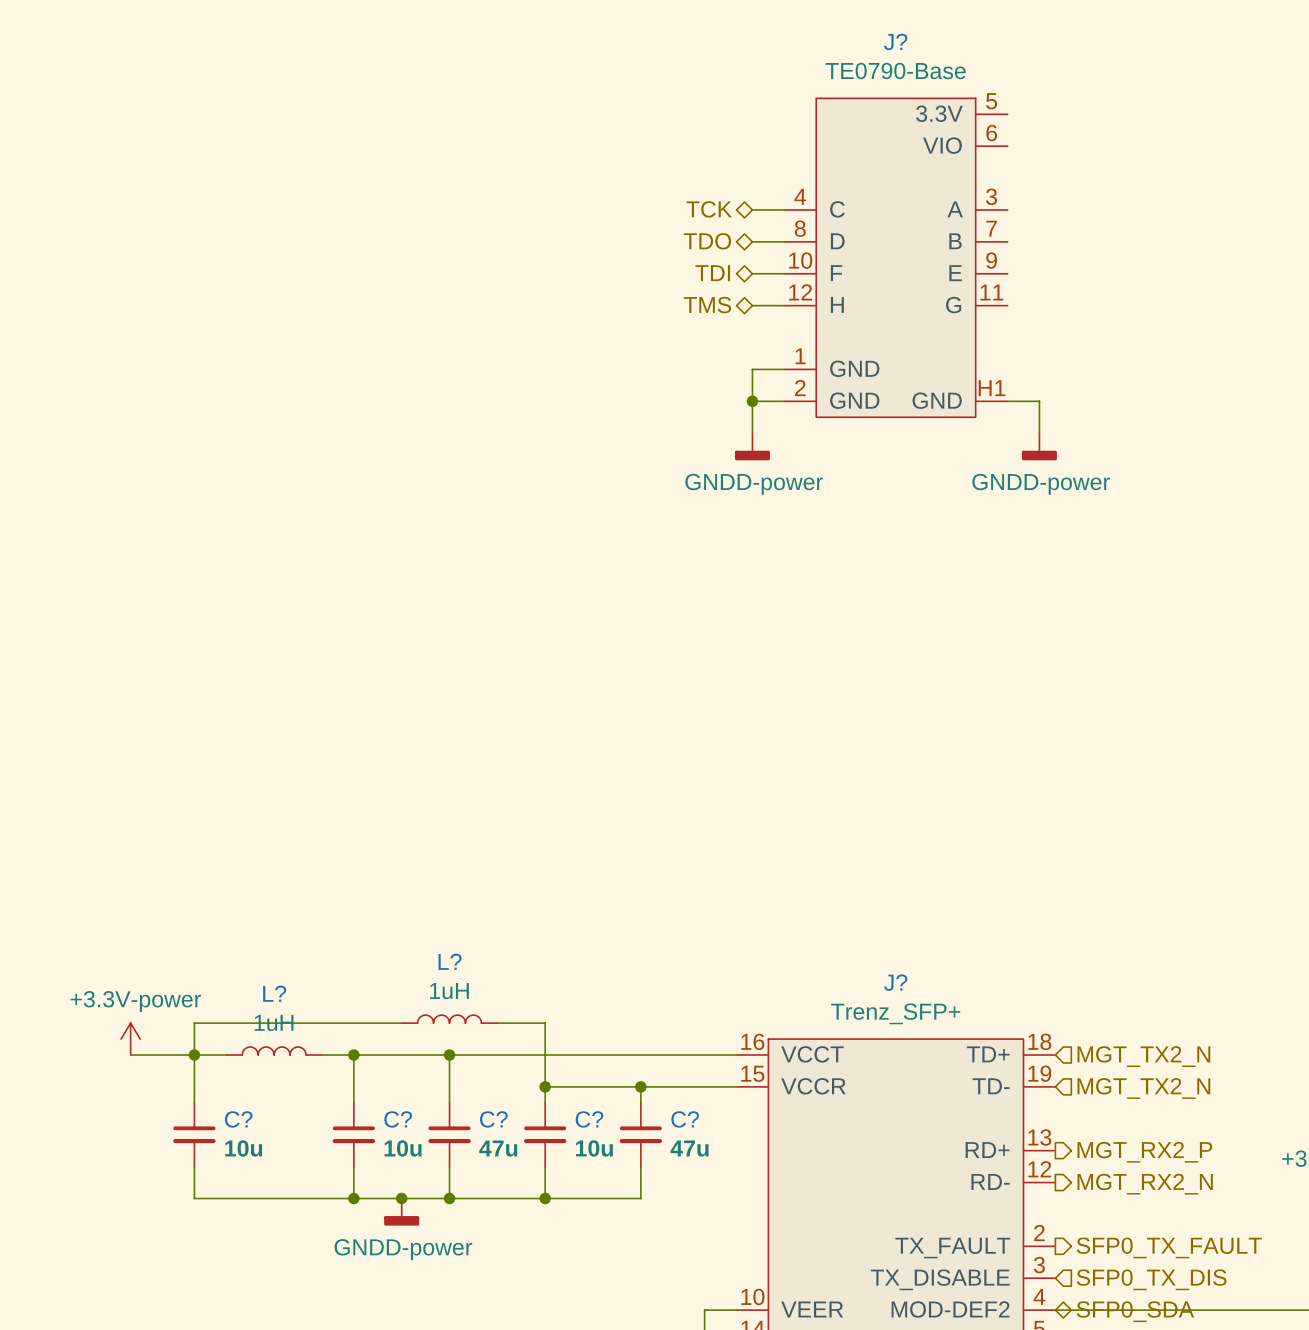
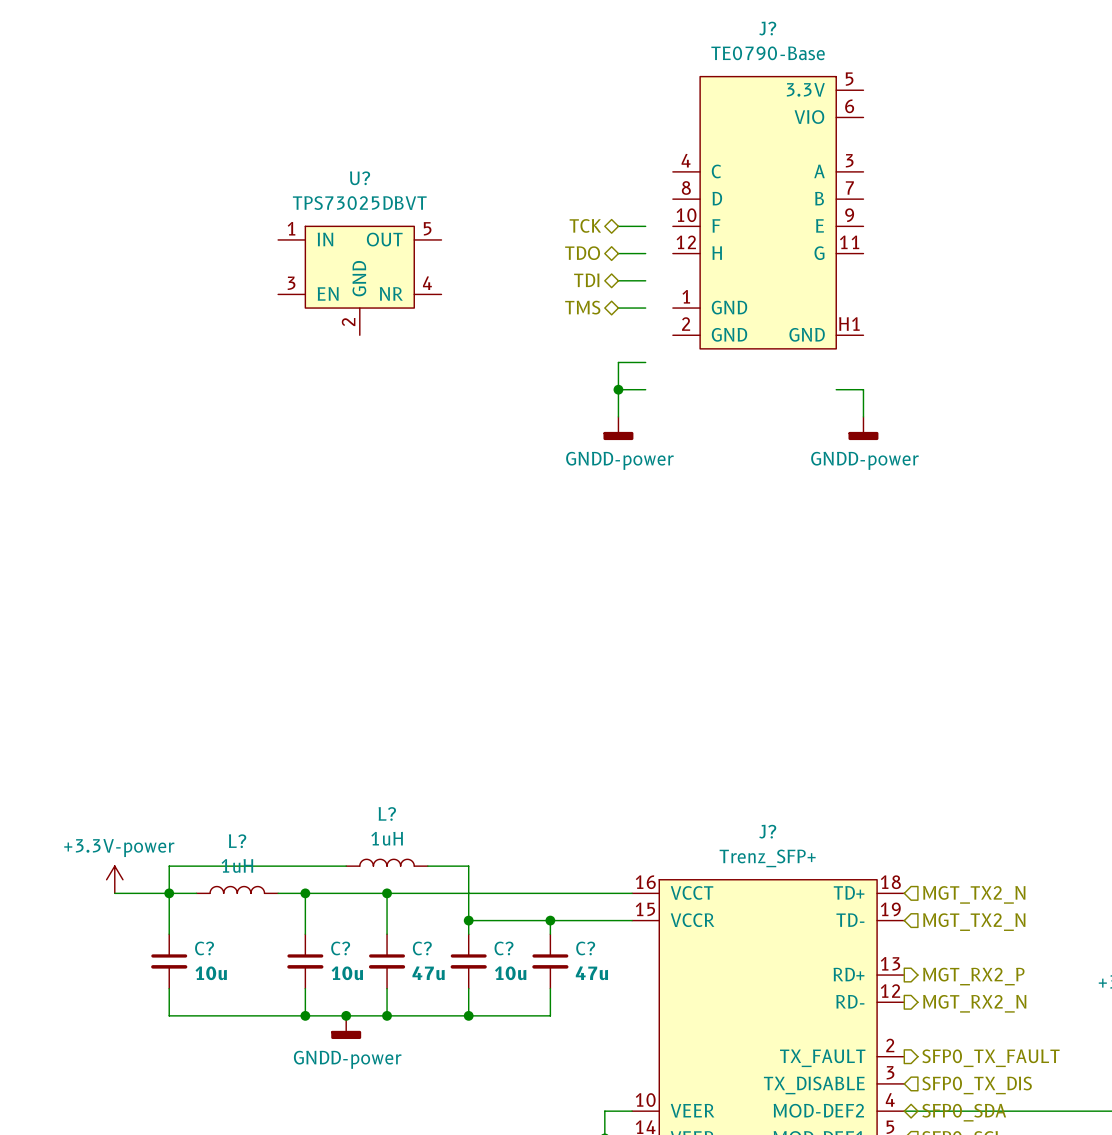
hierarchical label position: TCK (709, 209) -> TCK (585, 225)
wire: (752, 209) (784, 209) -> (618, 308) (645, 308)
hierarchical label position: TDO (707, 241) -> TDO (582, 253)
wire: (752, 241) (784, 241) -> (618, 280) (645, 280)
hierarchical label position: TDI (712, 273) -> TDI (586, 280)
wire: (752, 273) (784, 273) -> (645, 226) (618, 226)
hierarchical label position: TMS (707, 305) -> TMS (582, 307)
wire: (752, 305) (784, 305) -> (645, 253) (618, 253)
U?: none -> TPS73025DBVT (359, 280)
wire: (784, 369) (752, 369) (752, 433) -> (618, 416) (618, 362) (645, 362)
wire: (752, 401) (784, 401) -> (618, 389) (645, 389)
junction position: (752, 401) -> (618, 389)
wire: (1007, 401) (1039, 401) (1039, 433) -> (836, 389) (863, 389) (863, 416)
power symbol position: GNDD-power (752, 446) -> GNDD-power (618, 428)
power symbol position: GNDD-power (1039, 446) -> GNDD-power (863, 428)

